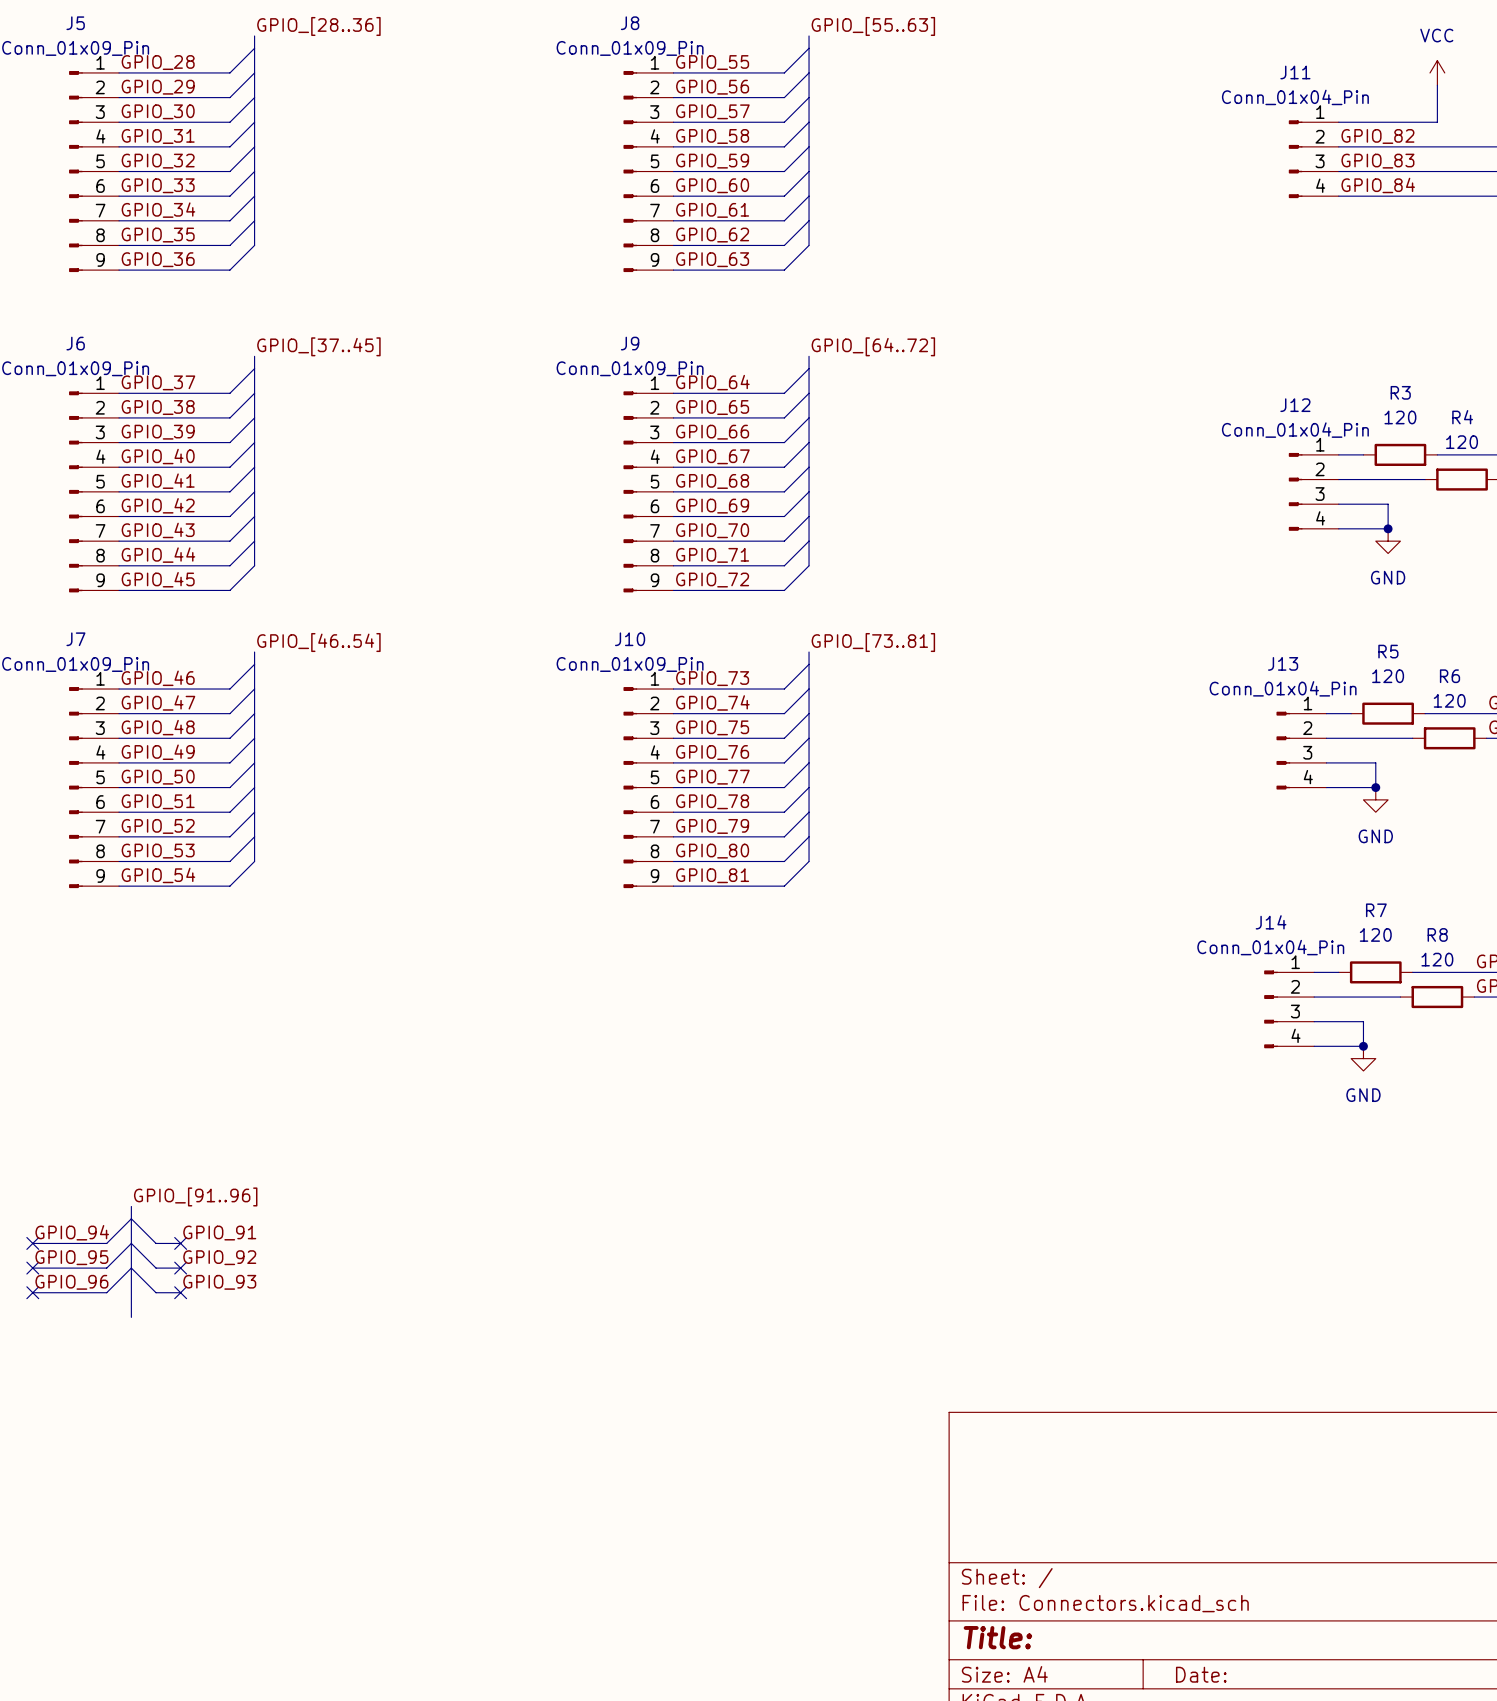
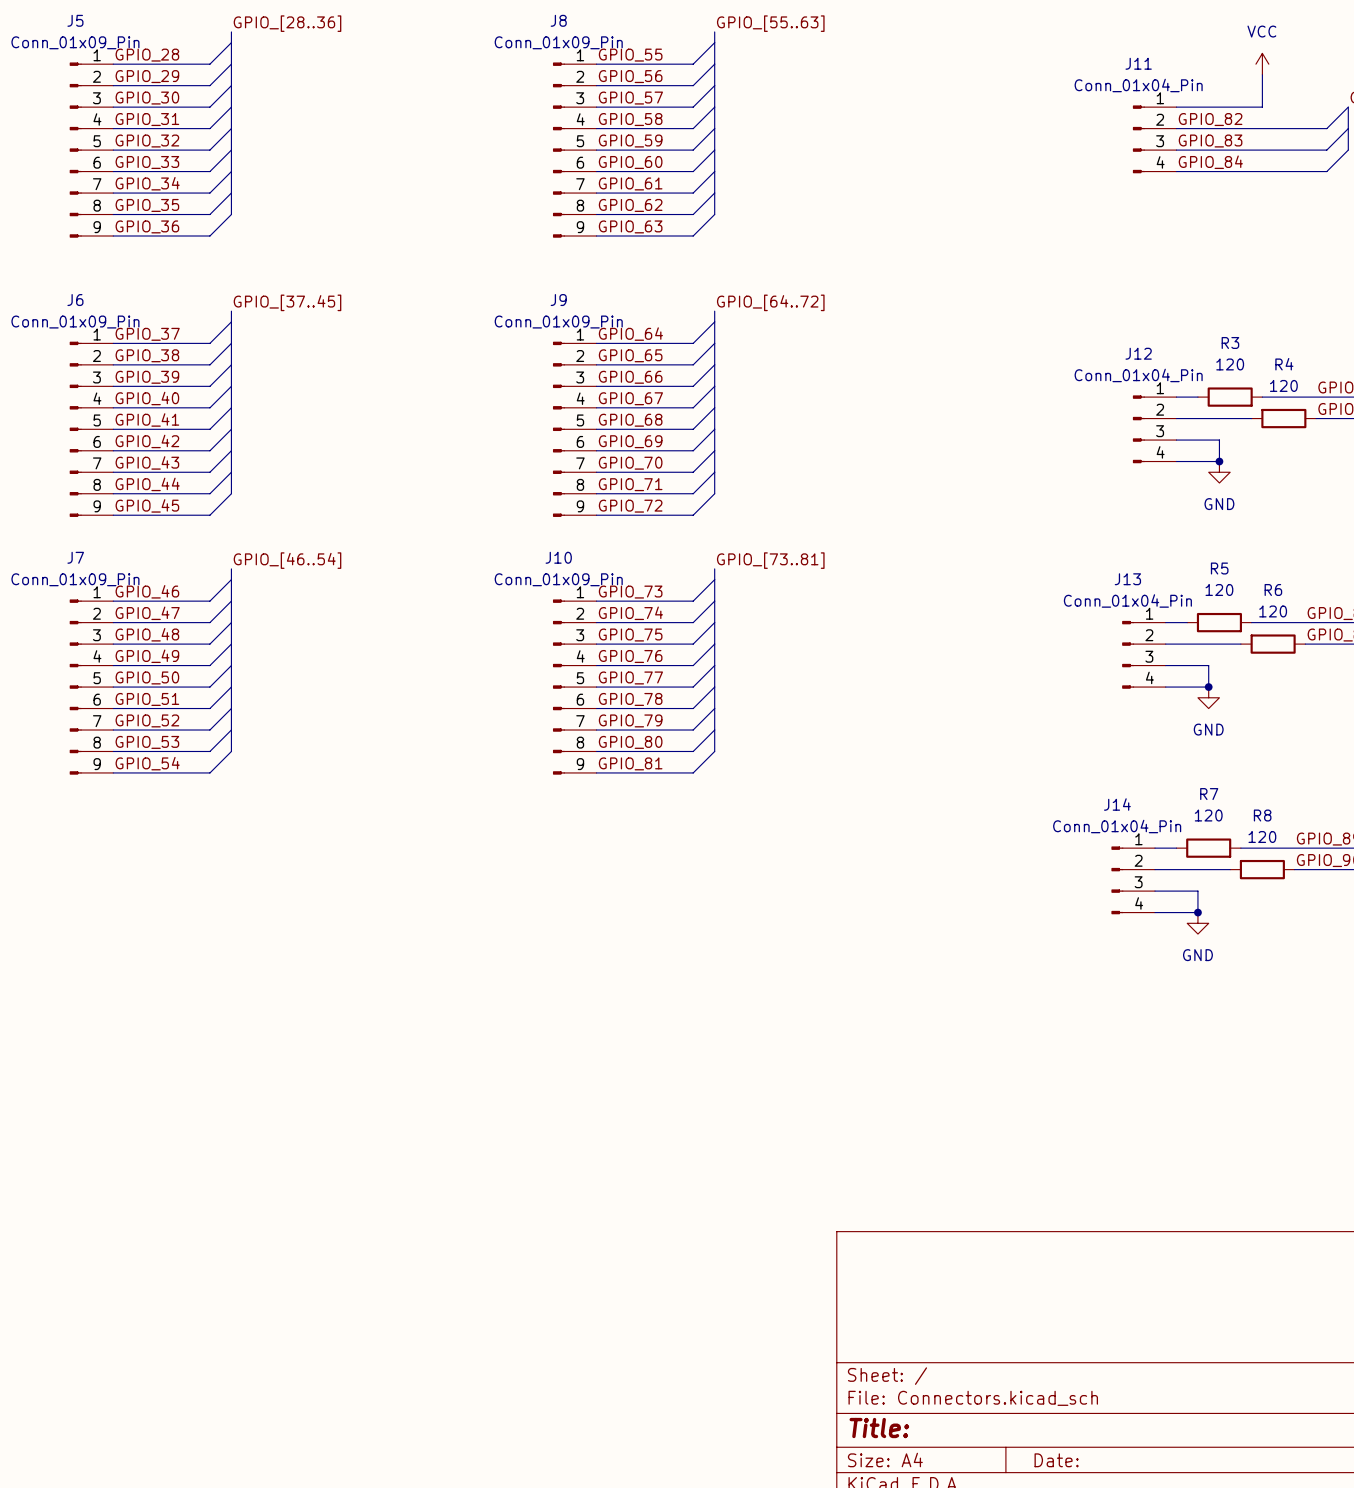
label: GPIO_[91..96] (195, 1196) -> none
bus: (131, 1206) (131, 1317) -> none
label: GPIO_94 (72, 1232) -> none
label: GPIO_91 (219, 1233) -> none
wire: (32, 1243) (106, 1243) (131, 1218) (156, 1243) (180, 1243) -> none
no-connect mark: (32, 1243) -> none
no-connect mark: (180, 1243) -> none
label: GPIO_95 (71, 1257) -> none
label: GPIO_92 (219, 1257) -> none
wire: (32, 1268) (106, 1268) (131, 1243) (156, 1268) (180, 1268) -> none
no-connect mark: (32, 1268) -> none
no-connect mark: (180, 1268) -> none
label: GPIO_96 (71, 1282) -> none
label: GPIO_93 (219, 1282) -> none
wire: (32, 1292) (106, 1292) (131, 1268) (156, 1292) (180, 1292) -> none
no-connect mark: (32, 1292) -> none
no-connect mark: (180, 1292) -> none

